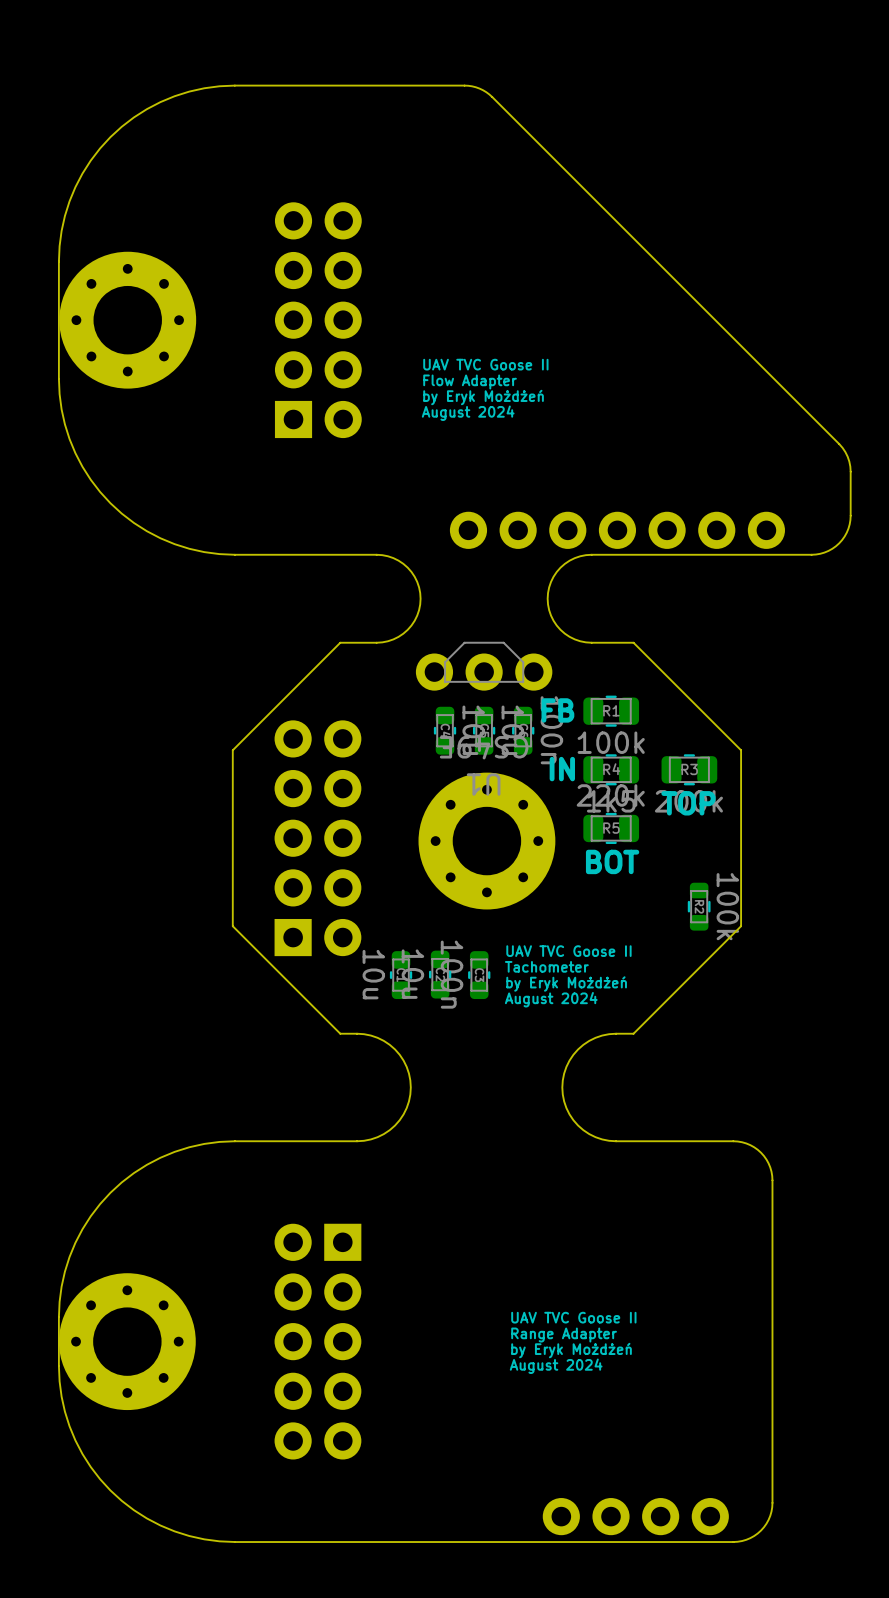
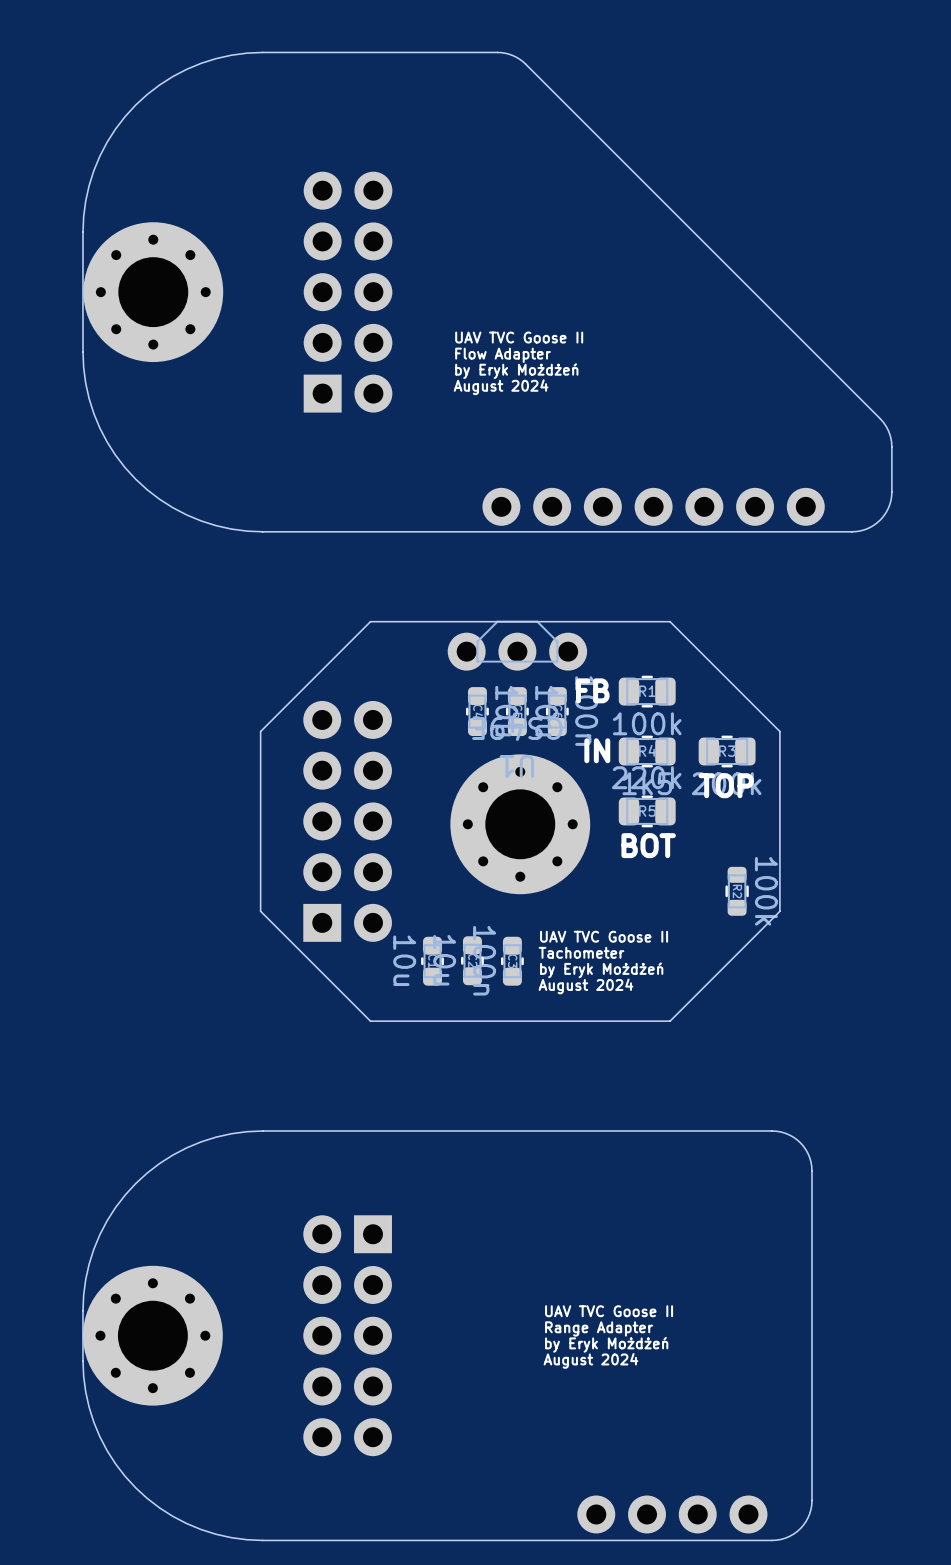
board edge: (376, 554) (393, 558) (407, 567) (417, 581) (420, 598) (417, 615) (407, 629) (393, 639) (376, 642) -> (627, 621) (407, 621)
board edge: (591, 554) (574, 558) (560, 567) (551, 581) (547, 598) (551, 615) (560, 629) (574, 639) (591, 642) -> (627, 531) (407, 531)
board edge: (357, 1033) (377, 1037) (395, 1049) (406, 1066) (410, 1087) (406, 1108) (395, 1125) (377, 1137) (357, 1141) -> (652, 1130) (387, 1130)
board edge: (616, 1033) (595, 1037) (578, 1049) (566, 1066) (562, 1087) (566, 1108) (578, 1125) (595, 1137) (616, 1141) -> (652, 1021) (387, 1021)

